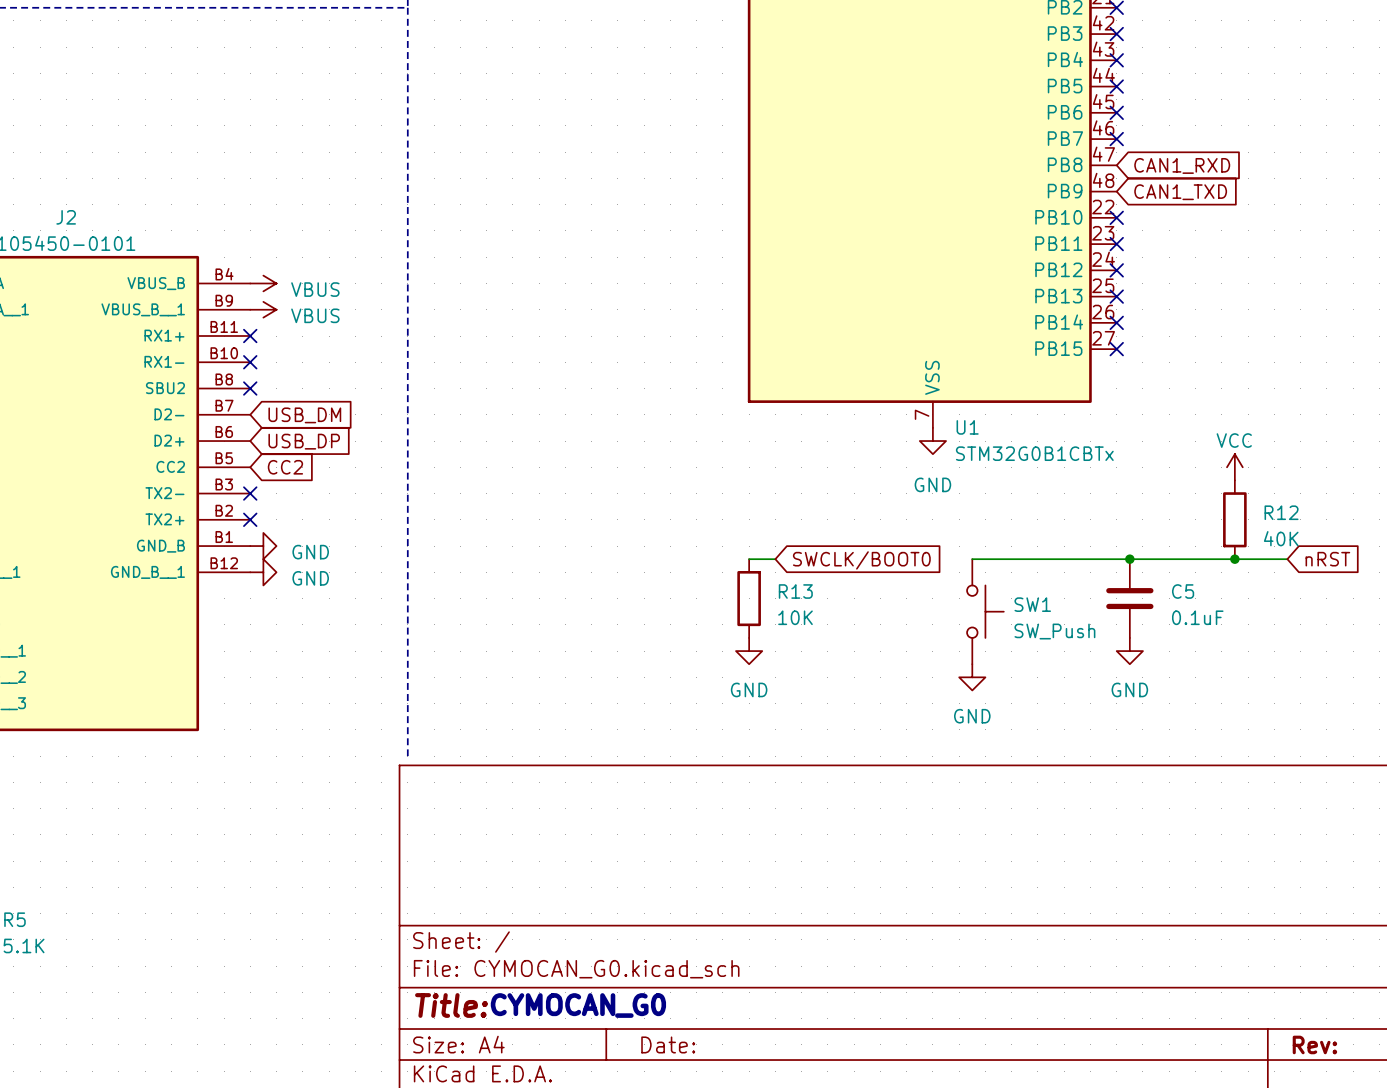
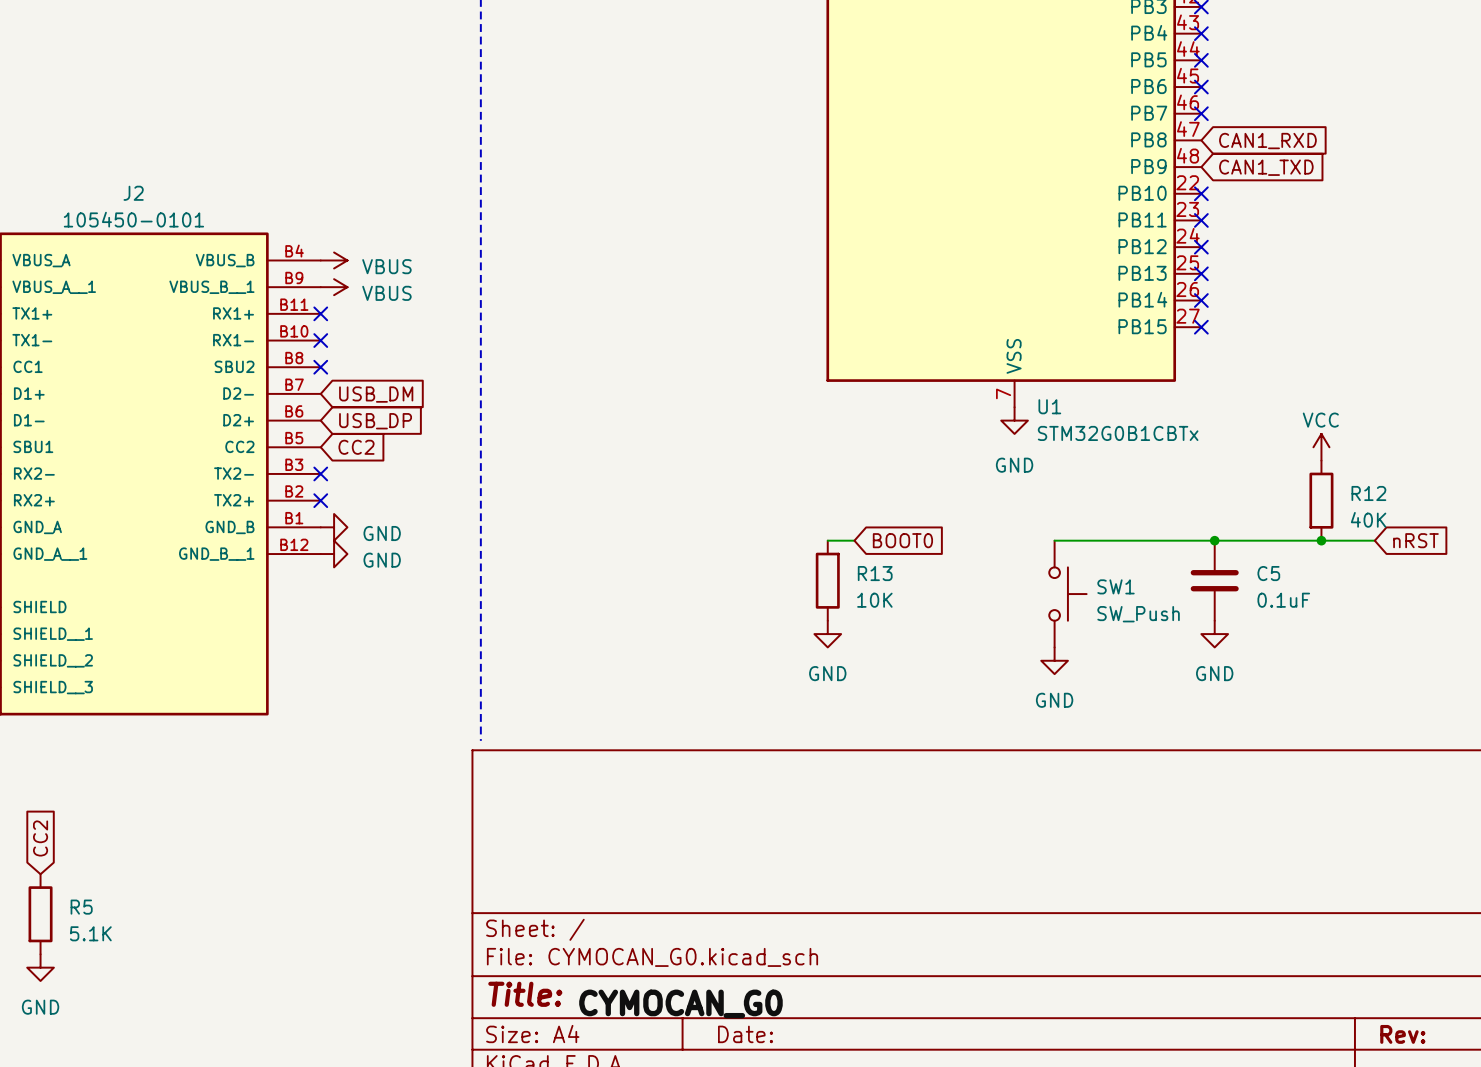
global label: SWCLK/BOOT0 (861, 560) -> BOOT0 (902, 540)
text: CYMOCAN_G0 (578, 1005) -> none
label: none -> CYMOCAN_G0 (680, 1003)

